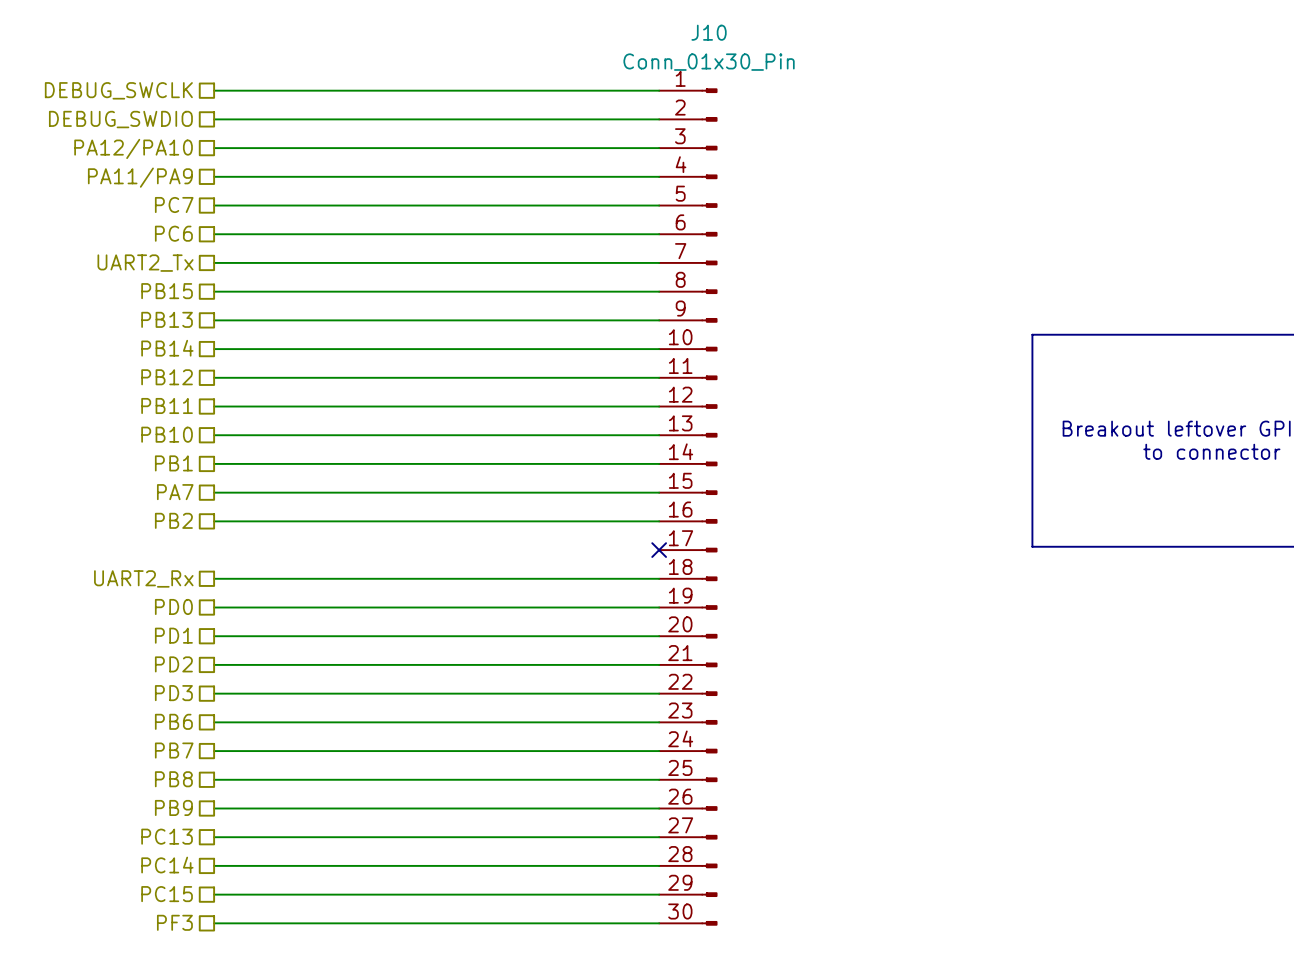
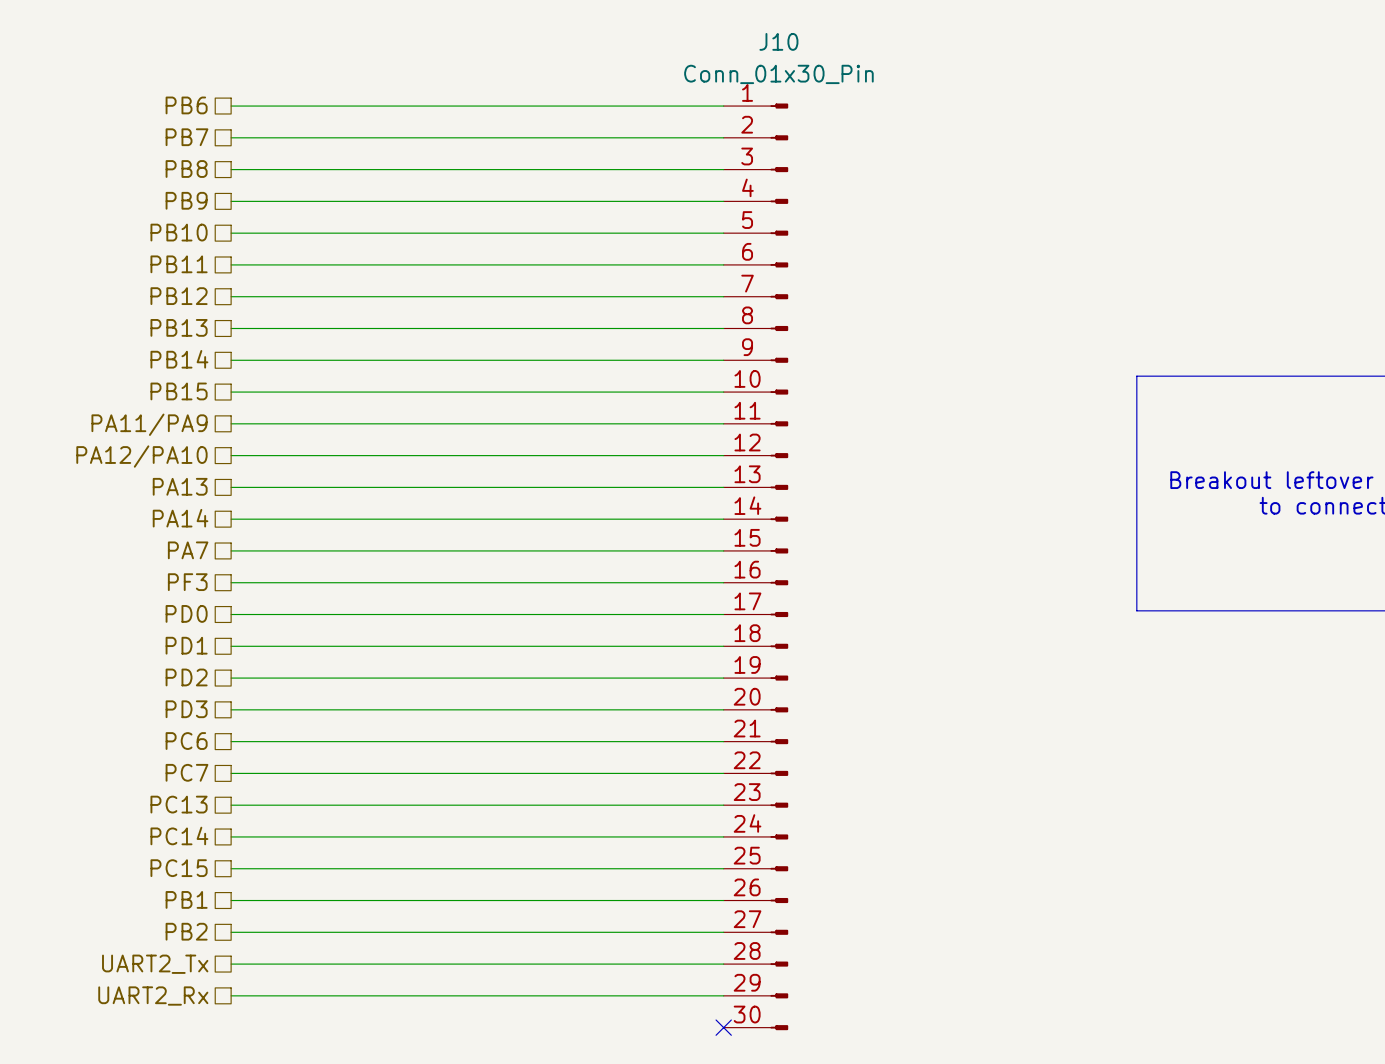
hierarchical label: DEBUG_SWCLK (118, 90) -> PB6 (186, 105)
hierarchical label: DEBUG_SWDIO (120, 119) -> PB7 (186, 137)
hierarchical label: PA12/PA10 (133, 148) -> PB8 (186, 169)
hierarchical label: PA11/PA9 (140, 177) -> PB9 (186, 200)
hierarchical label: PC7 (174, 204) -> PB10 (179, 232)
hierarchical label: PC6 (173, 233) -> PB11 (179, 264)
hierarchical label: UART2_Tx (145, 263) -> PB12 (179, 296)
hierarchical label: PB15 (167, 291) -> PB13 (179, 327)
hierarchical label: PB13 (167, 319) -> PB14 (179, 359)
hierarchical label: PB14 (167, 348) -> PB15 (179, 391)
hierarchical label: PB12 (167, 377) -> PA11/PA9 (149, 424)
hierarchical label: PB11 (167, 405) -> PA12/PA10 (141, 456)
hierarchical label: PB10 (167, 434) -> PA13 (180, 486)
hierarchical label: PB1 (173, 463) -> PA14 (180, 518)
hierarchical label: PB2 (173, 520) -> PF3 (187, 582)
hierarchical label: none -> PD0 (186, 613)
wire: none -> (231, 614) (723, 614)
no-connect mark: (659, 550) -> none
hierarchical label: UART2_Rx (143, 578) -> PD1 (186, 645)
hierarchical label: PD0 (173, 606) -> PD2 (186, 677)
hierarchical label: PD1 (173, 635) -> PD3 (186, 709)
hierarchical label: PD2 (173, 664) -> PC6 (186, 741)
hierarchical label: PD3 (173, 693) -> PC7 (186, 772)
hierarchical label: PB6 (173, 721) -> PC13 (179, 804)
hierarchical label: PB7 (174, 750) -> PC14 (179, 835)
hierarchical label: PB8 (173, 779) -> PC15 (179, 868)
hierarchical label: PB9 (173, 807) -> PB1 (186, 899)
hierarchical label: PC13 (167, 836) -> PB2 (186, 931)
hierarchical label: PC14 (167, 865) -> UART2_Tx (155, 964)
hierarchical label: PC15 (167, 894) -> UART2_Rx (153, 996)
hierarchical label: PF3 (174, 922) -> none
wire: (214, 923) (659, 923) -> none
no-connect mark: none -> (723, 1027)

